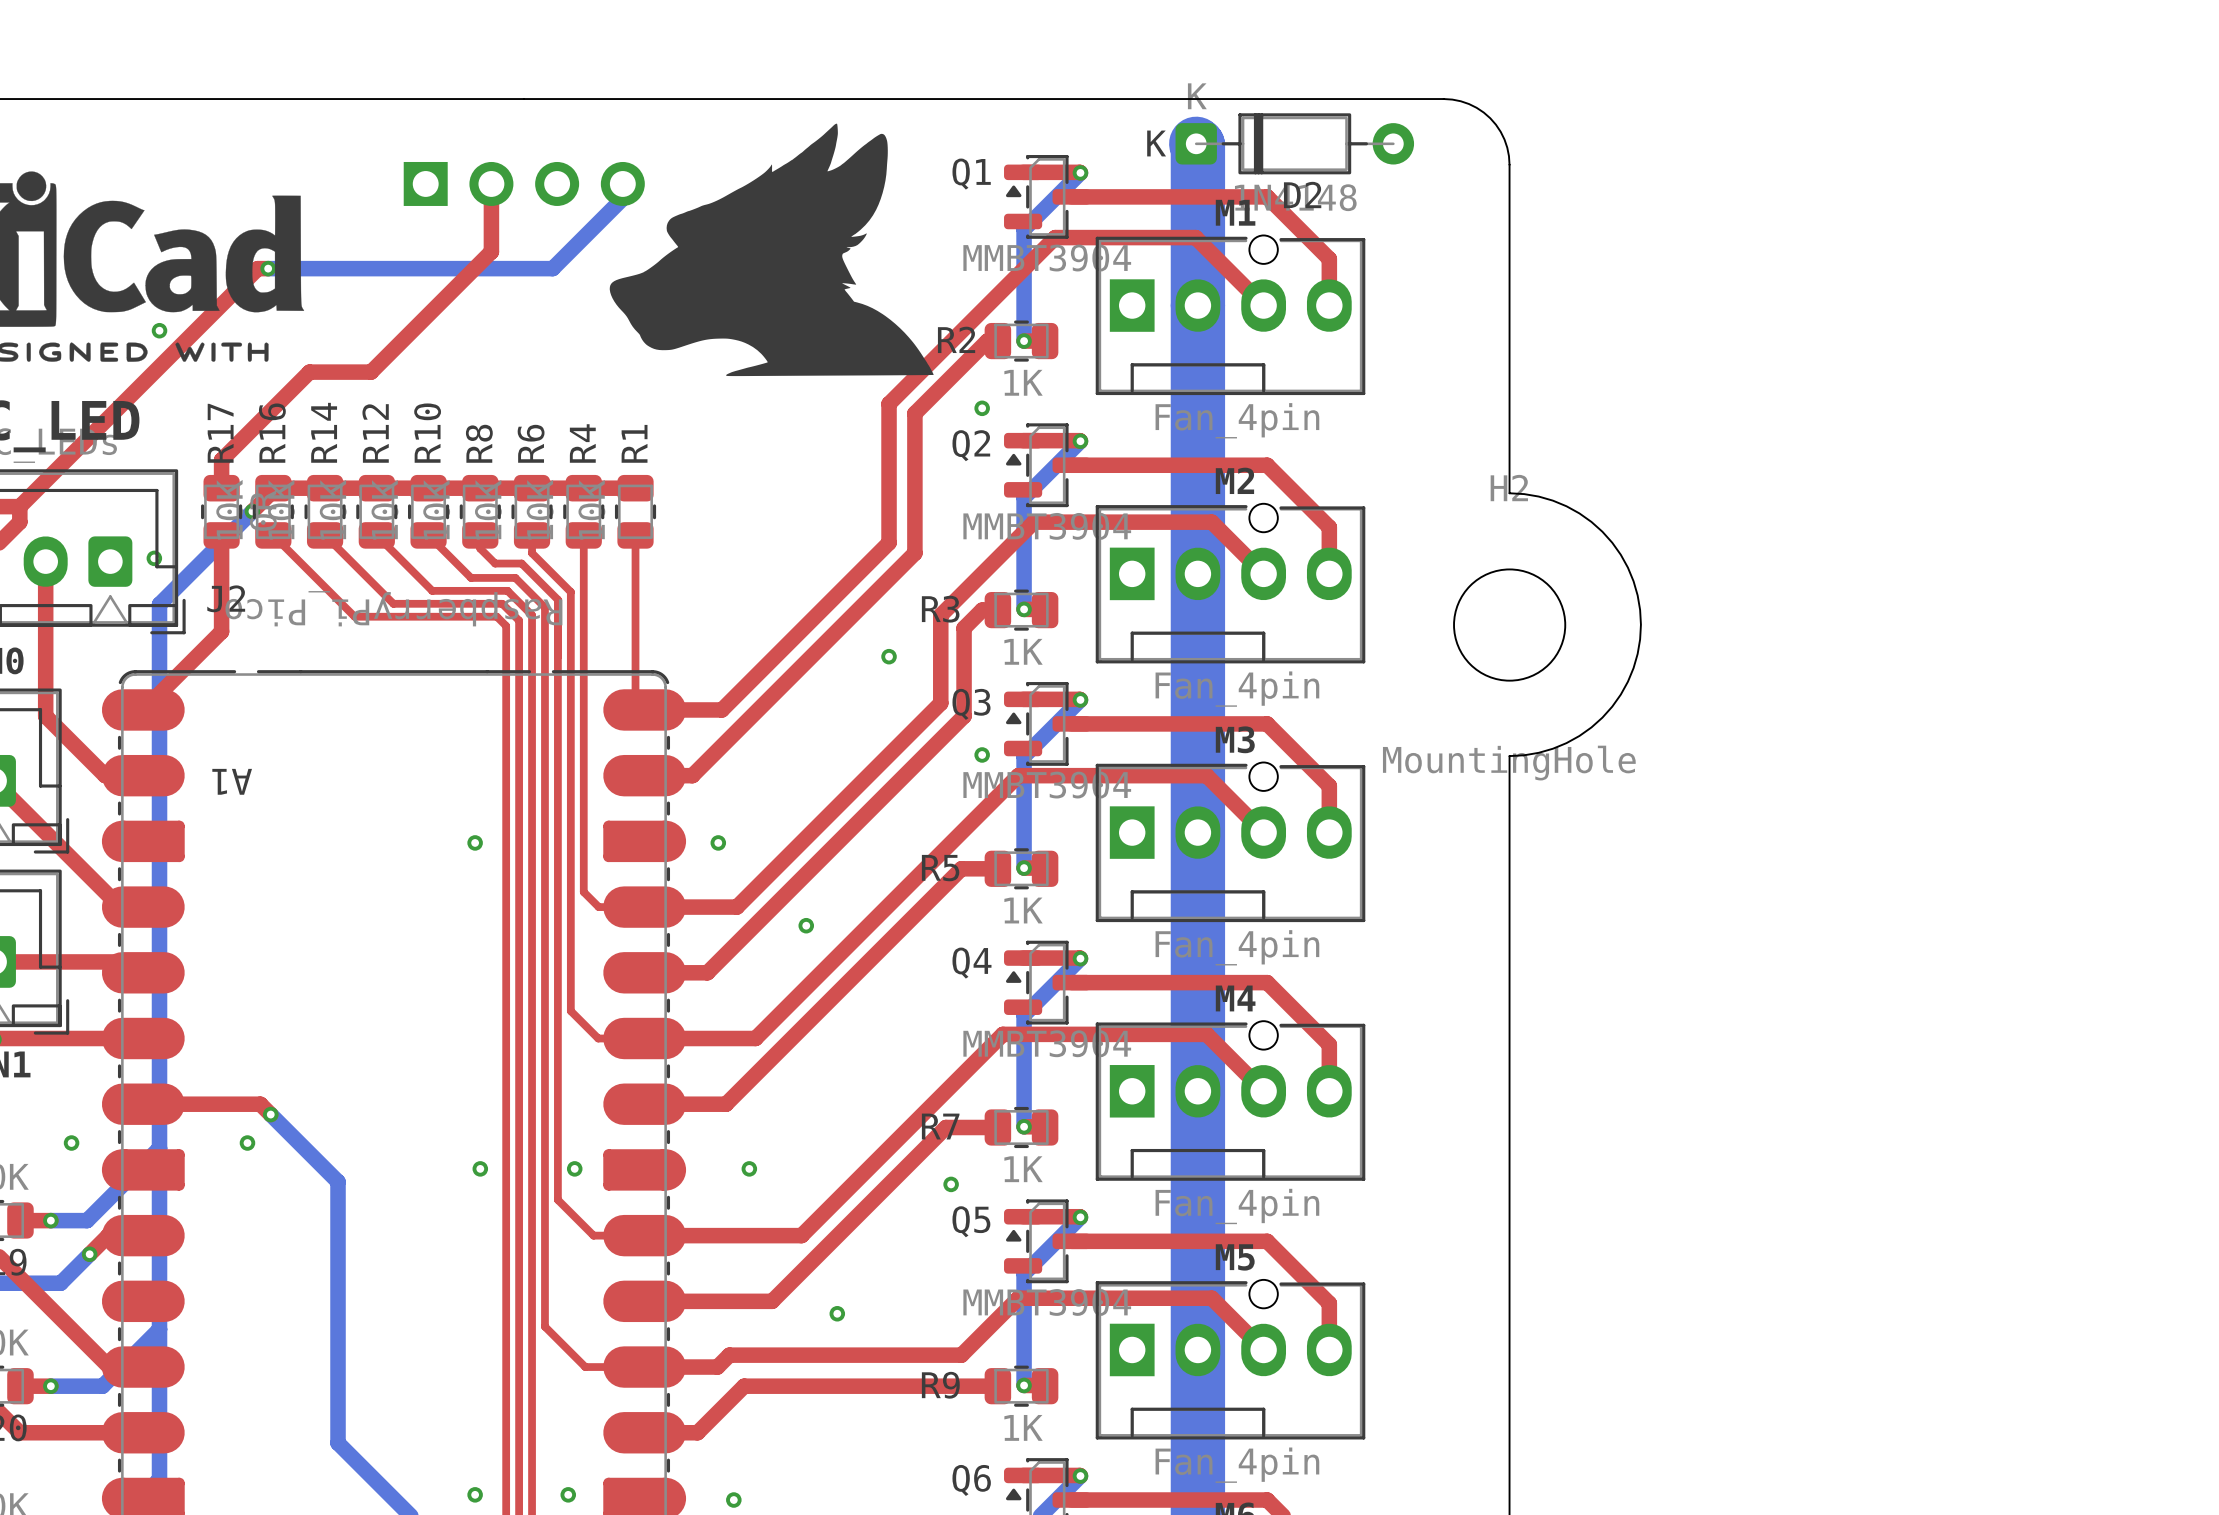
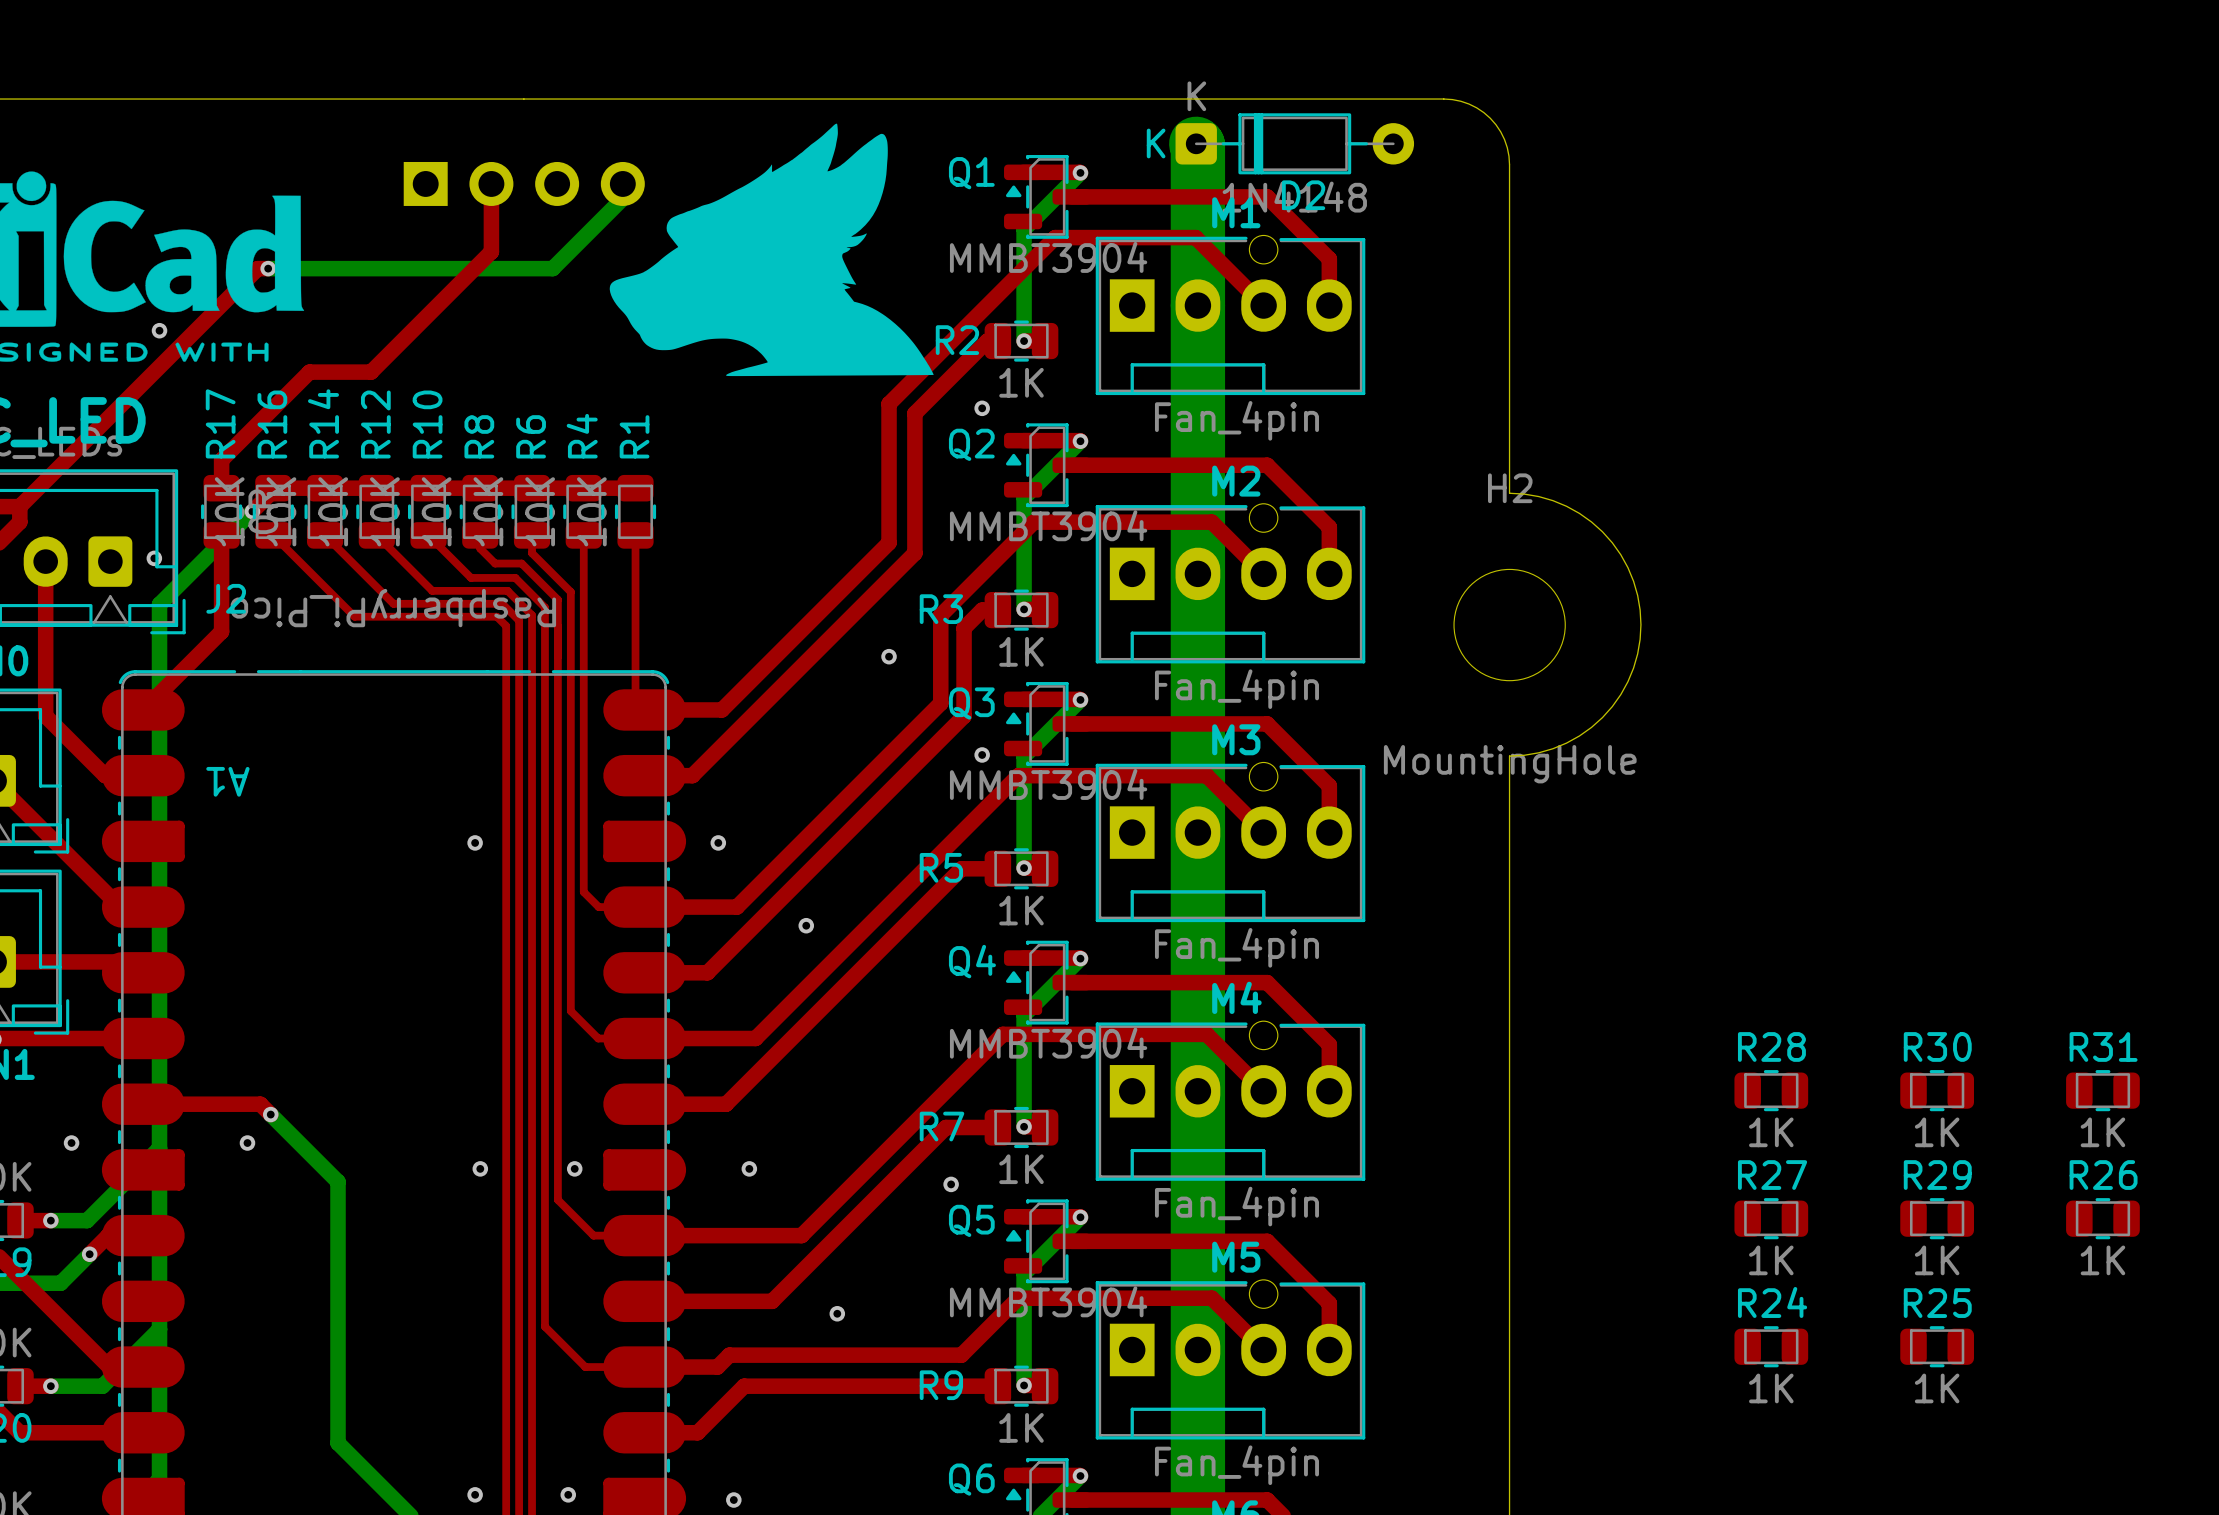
R28: none -> 1K (1771, 1090)
R30: none -> 1K (1937, 1090)
R31: none -> 1K (2102, 1090)
R27: none -> 1K (1771, 1218)
R29: none -> 1K (1937, 1218)
R26: none -> 1K (2102, 1218)
R24: none -> 1K (1771, 1346)
R25: none -> 1K (1937, 1346)

